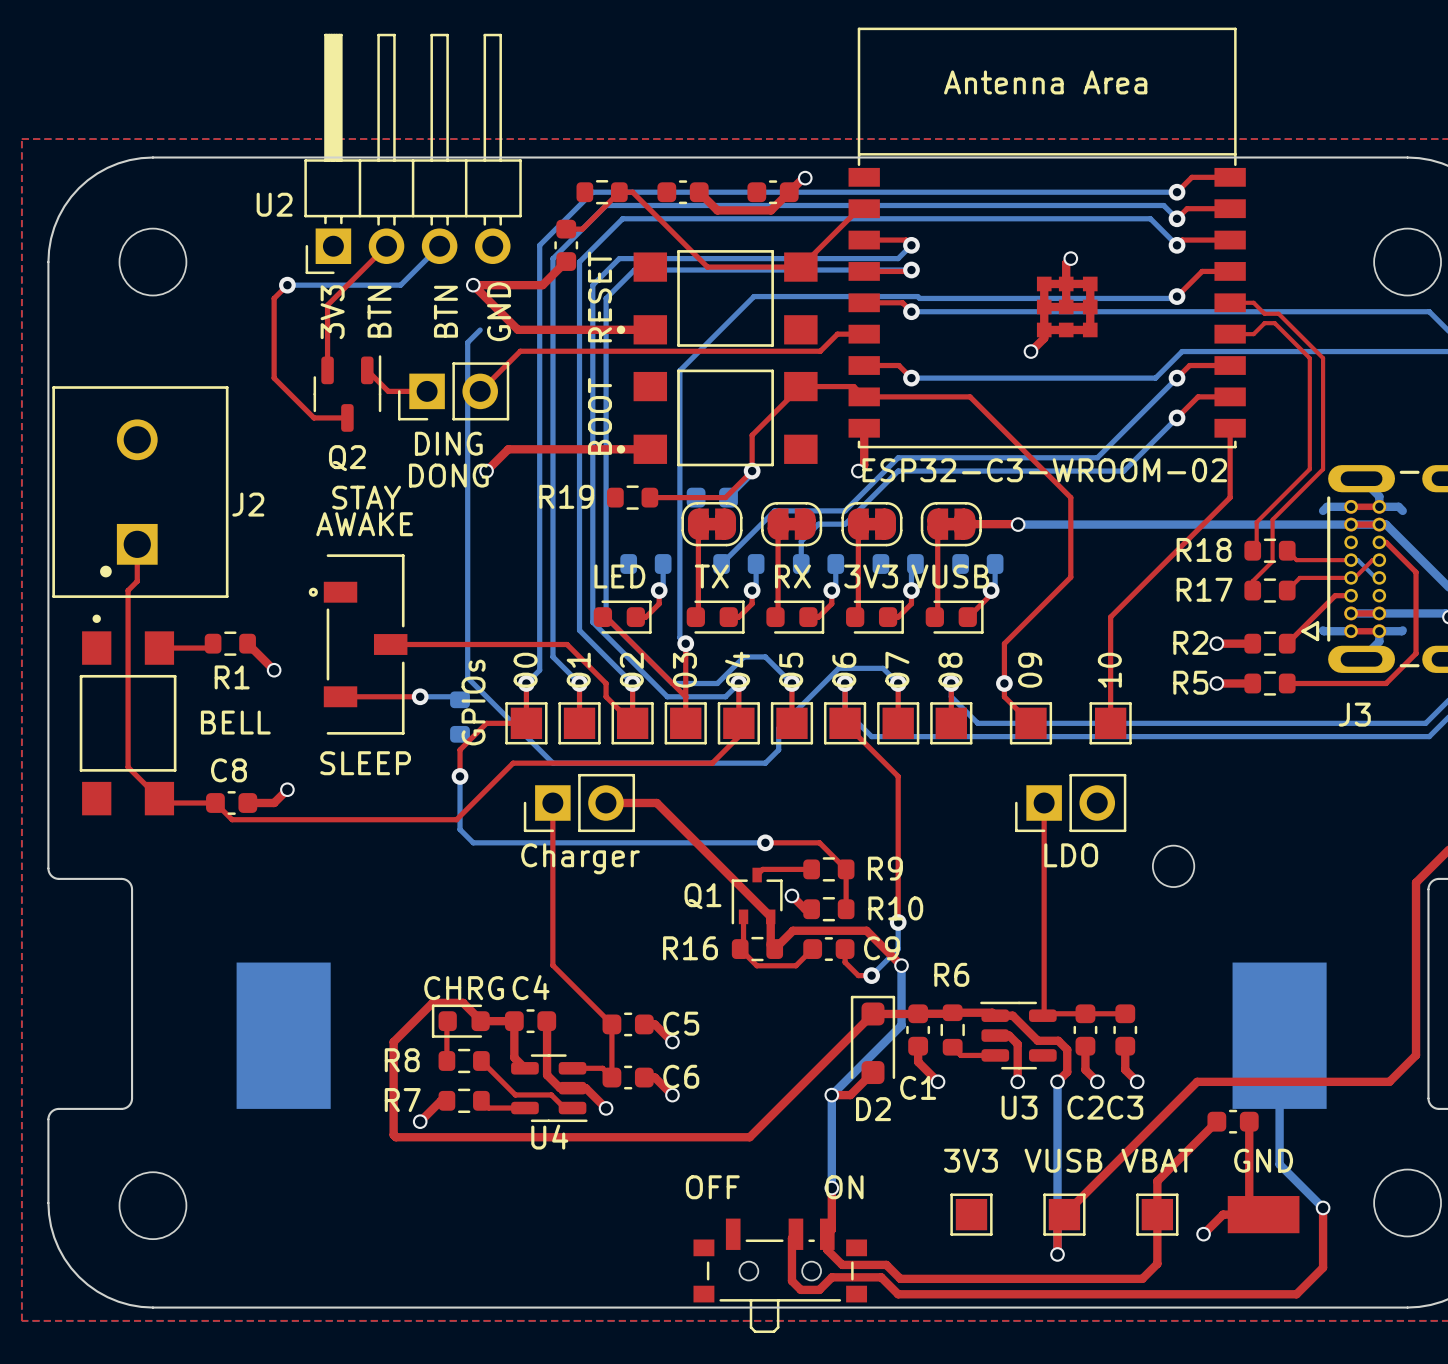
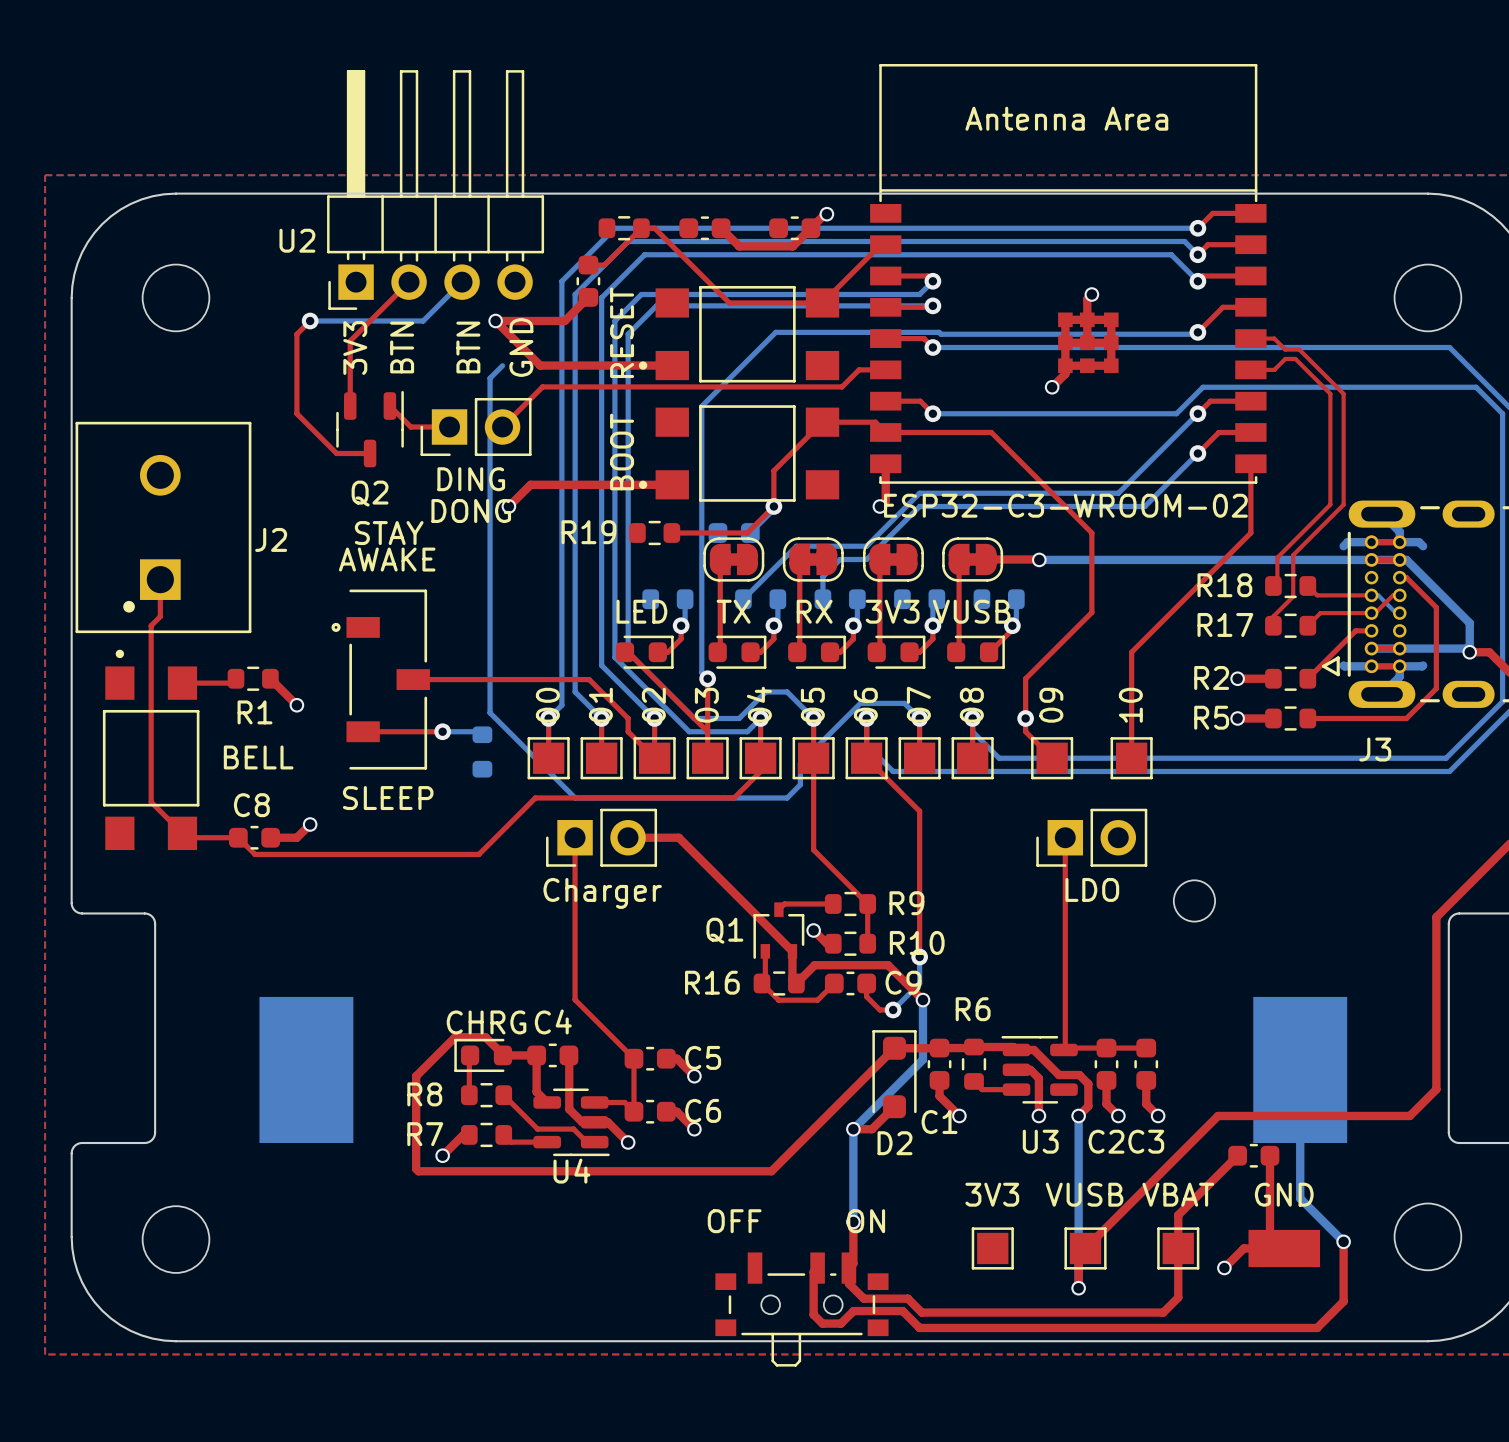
text: GPIOs (473, 702) -> none
top track: (526, 723) (486, 723) (460, 749) (460, 776) -> none
bottom track: (460, 776) (460, 829) (473, 842) (765, 842) -> none
via: (460, 776) -> none
top track: (765, 842) (819, 842) -> (813, 758) (813, 849) (841, 877)
via: (765, 842) -> none

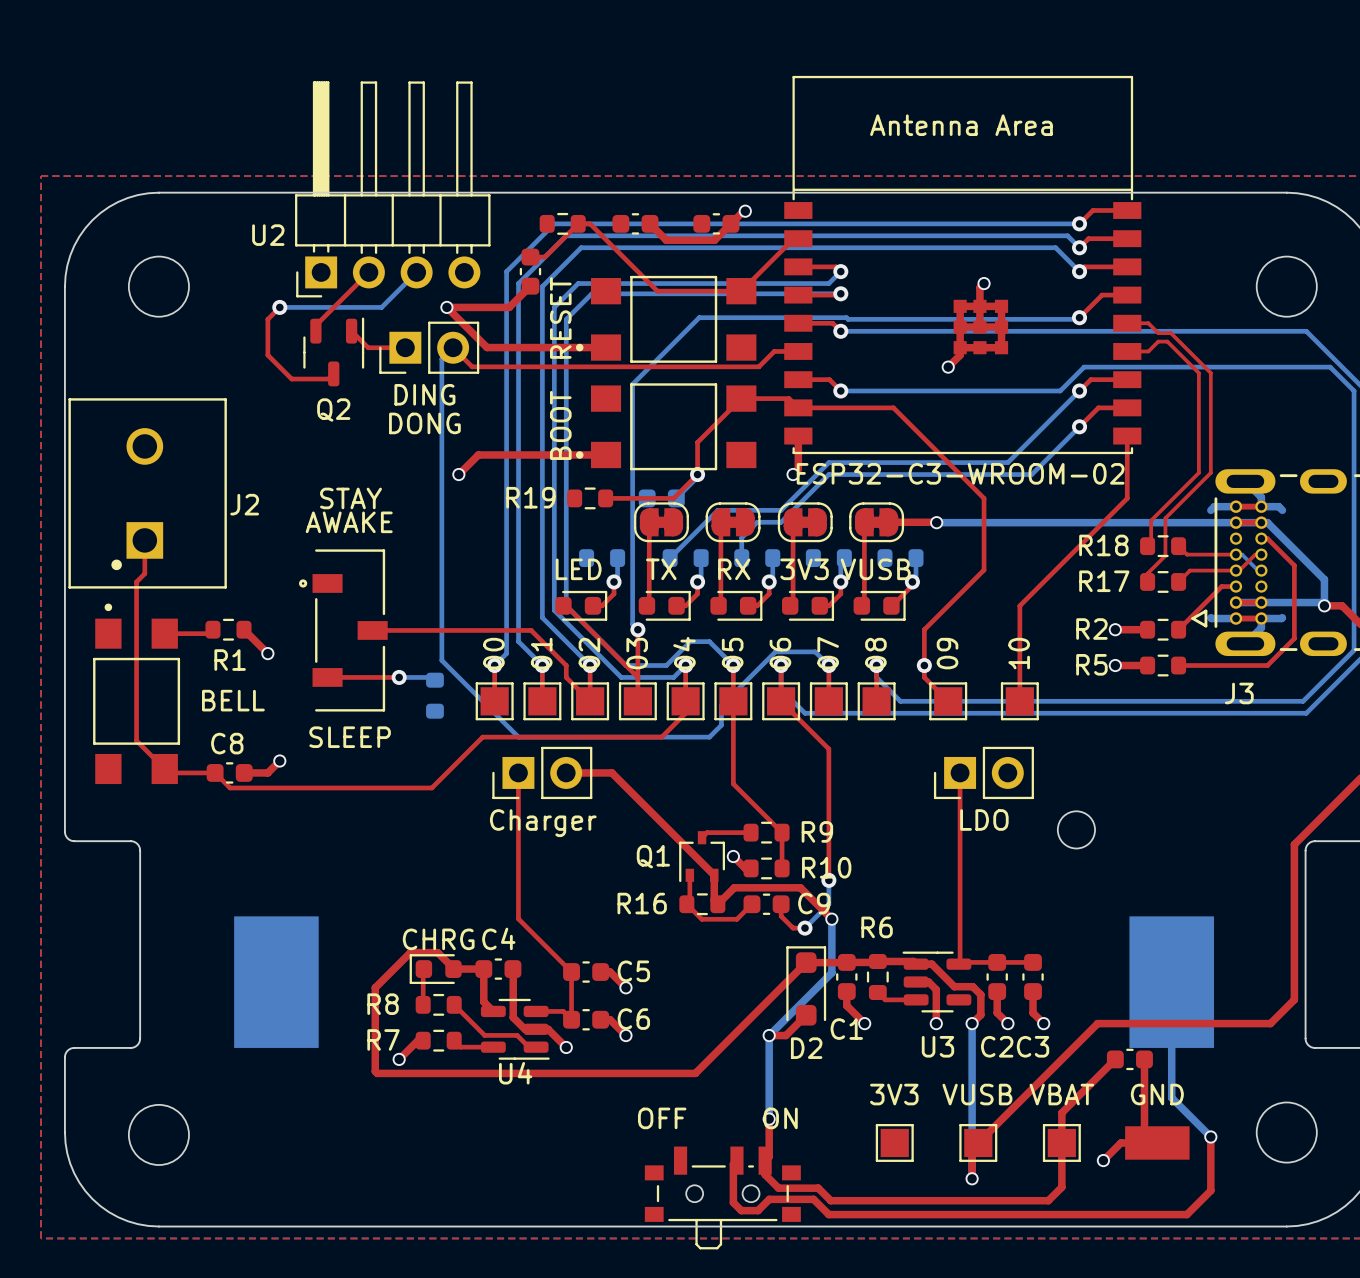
top track: (350, 347) (350, 406) -> none
top track: none -> (351, 331) (368, 347) (405, 347)
U2 text: BTN (402, 347) -> none
U2 text: BTN (468, 347) -> none
U2 text: GND (521, 347) -> none
U2 text: 3V3 (355, 348) -> none
top track: (296, 374) (296, 413) (336, 453) (370, 453) -> (267, 355) (291, 379) (328, 379) (333, 373)
top track: (542, 386) (502, 427) -> (489, 366) (472, 366) (453, 347)
top track: (389, 406) (410, 427) (449, 427) -> none
part position: (476, 427) -> (429, 347)
Q2 position: (370, 429) -> (333, 351)

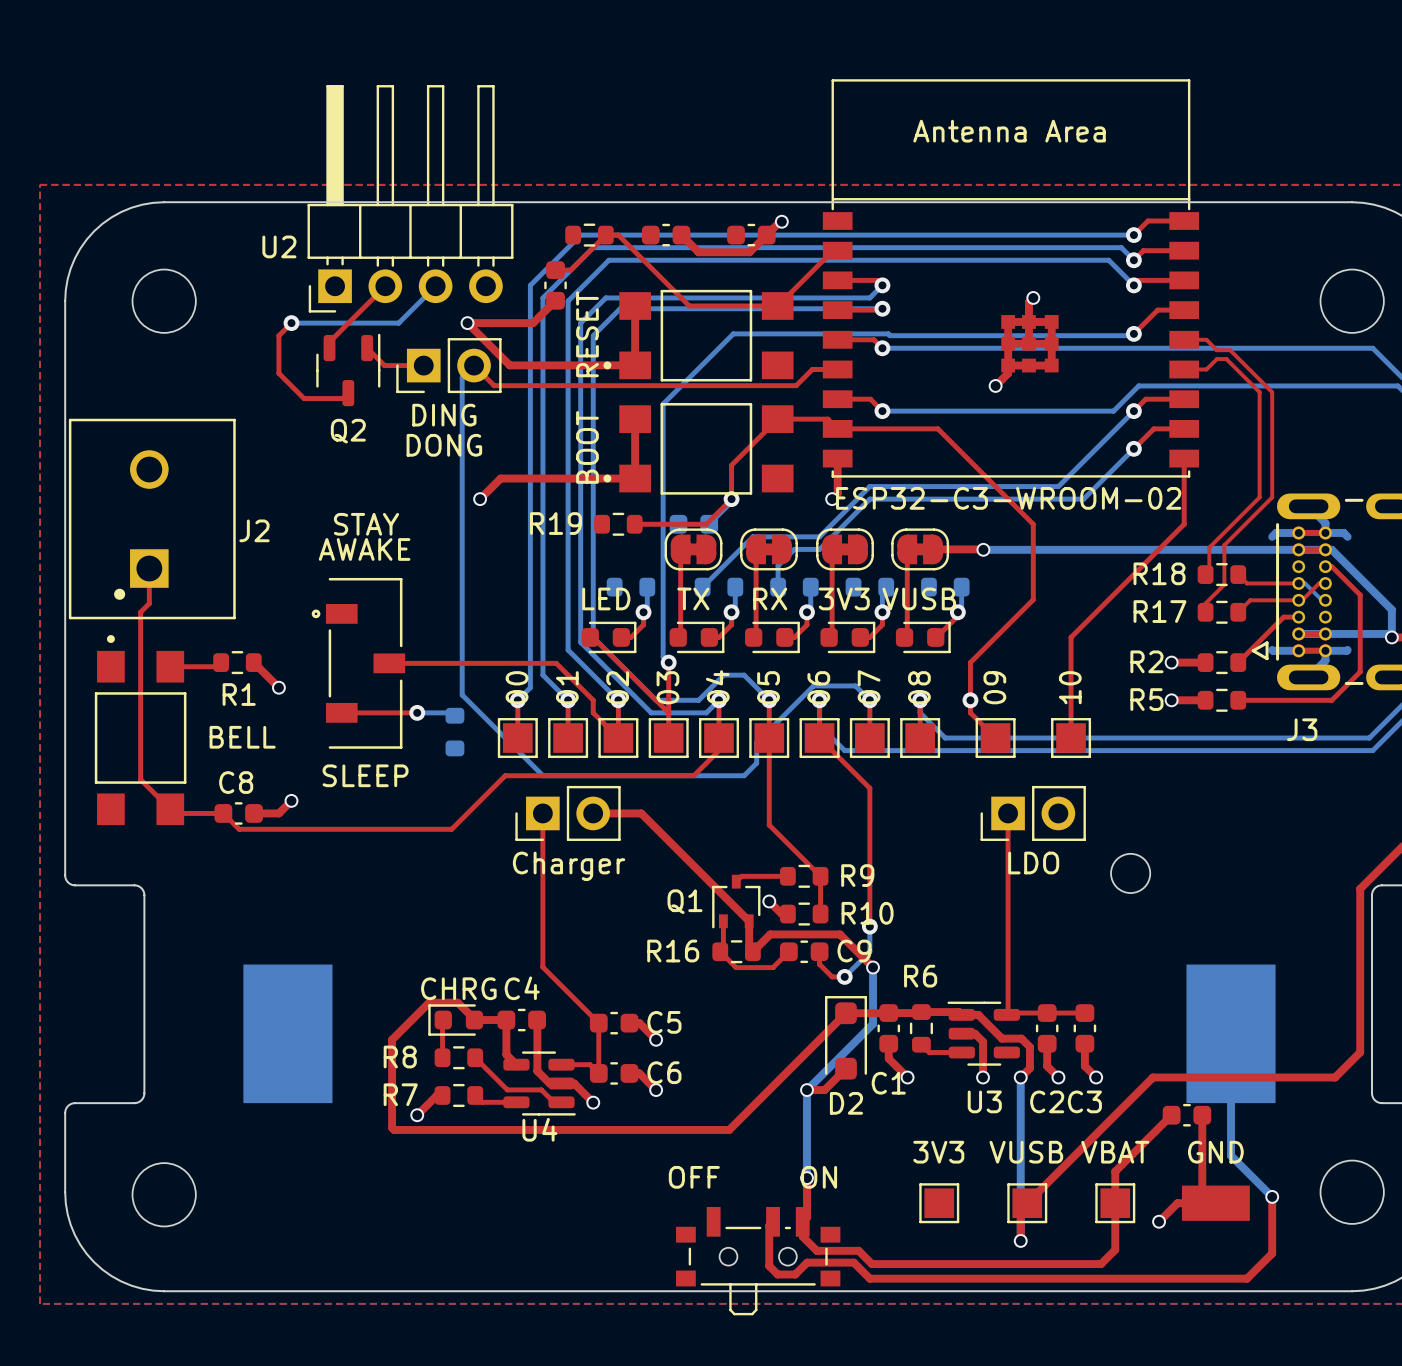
top track: none -> (635, 305) (635, 365)
top track: none -> (635, 419) (635, 478)

